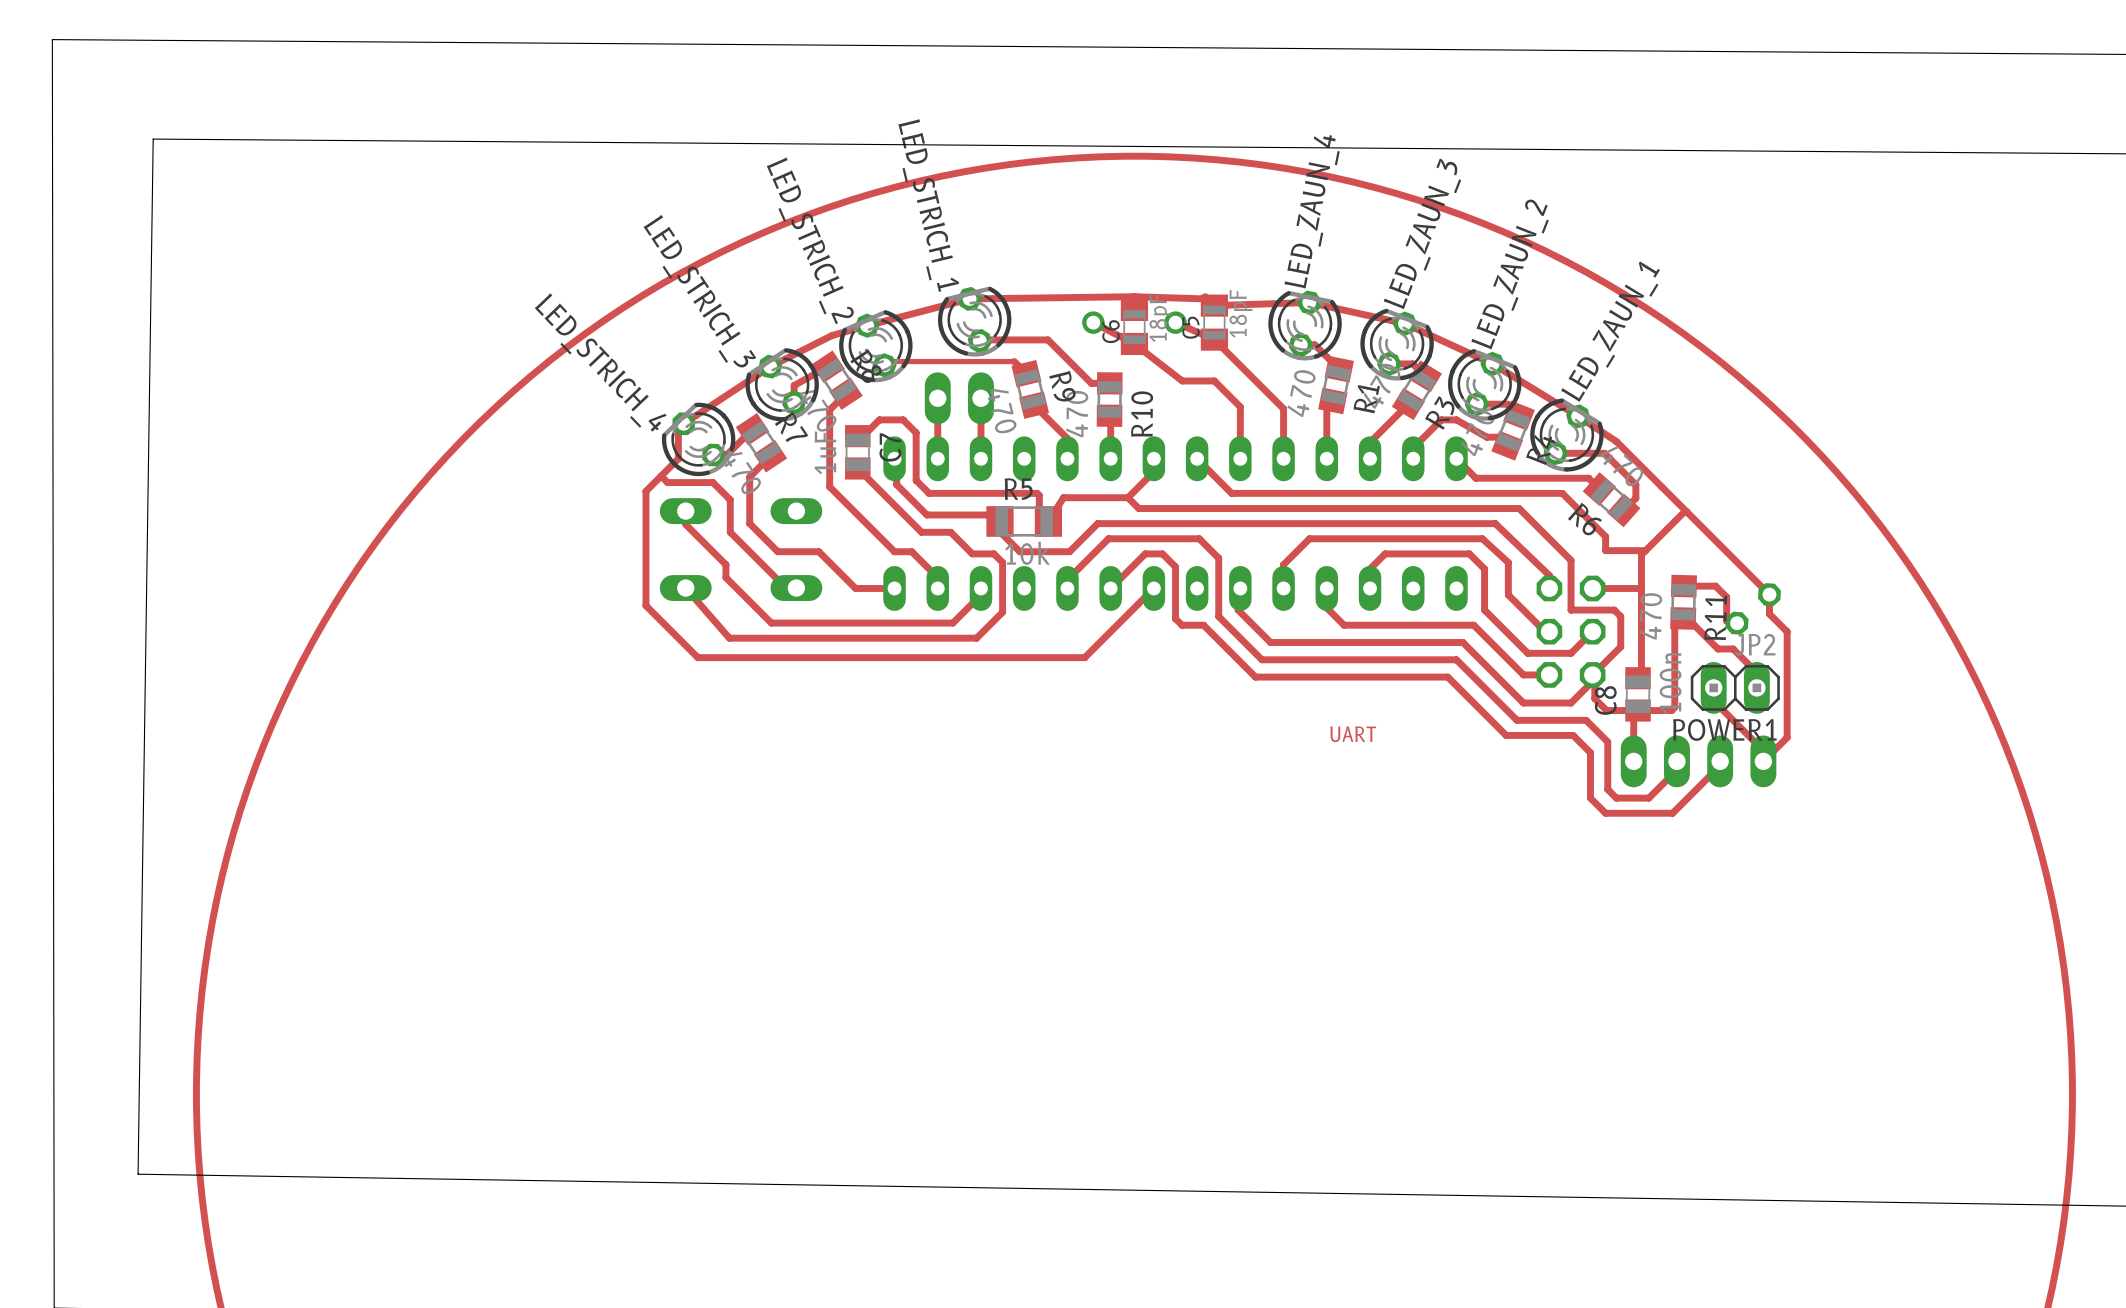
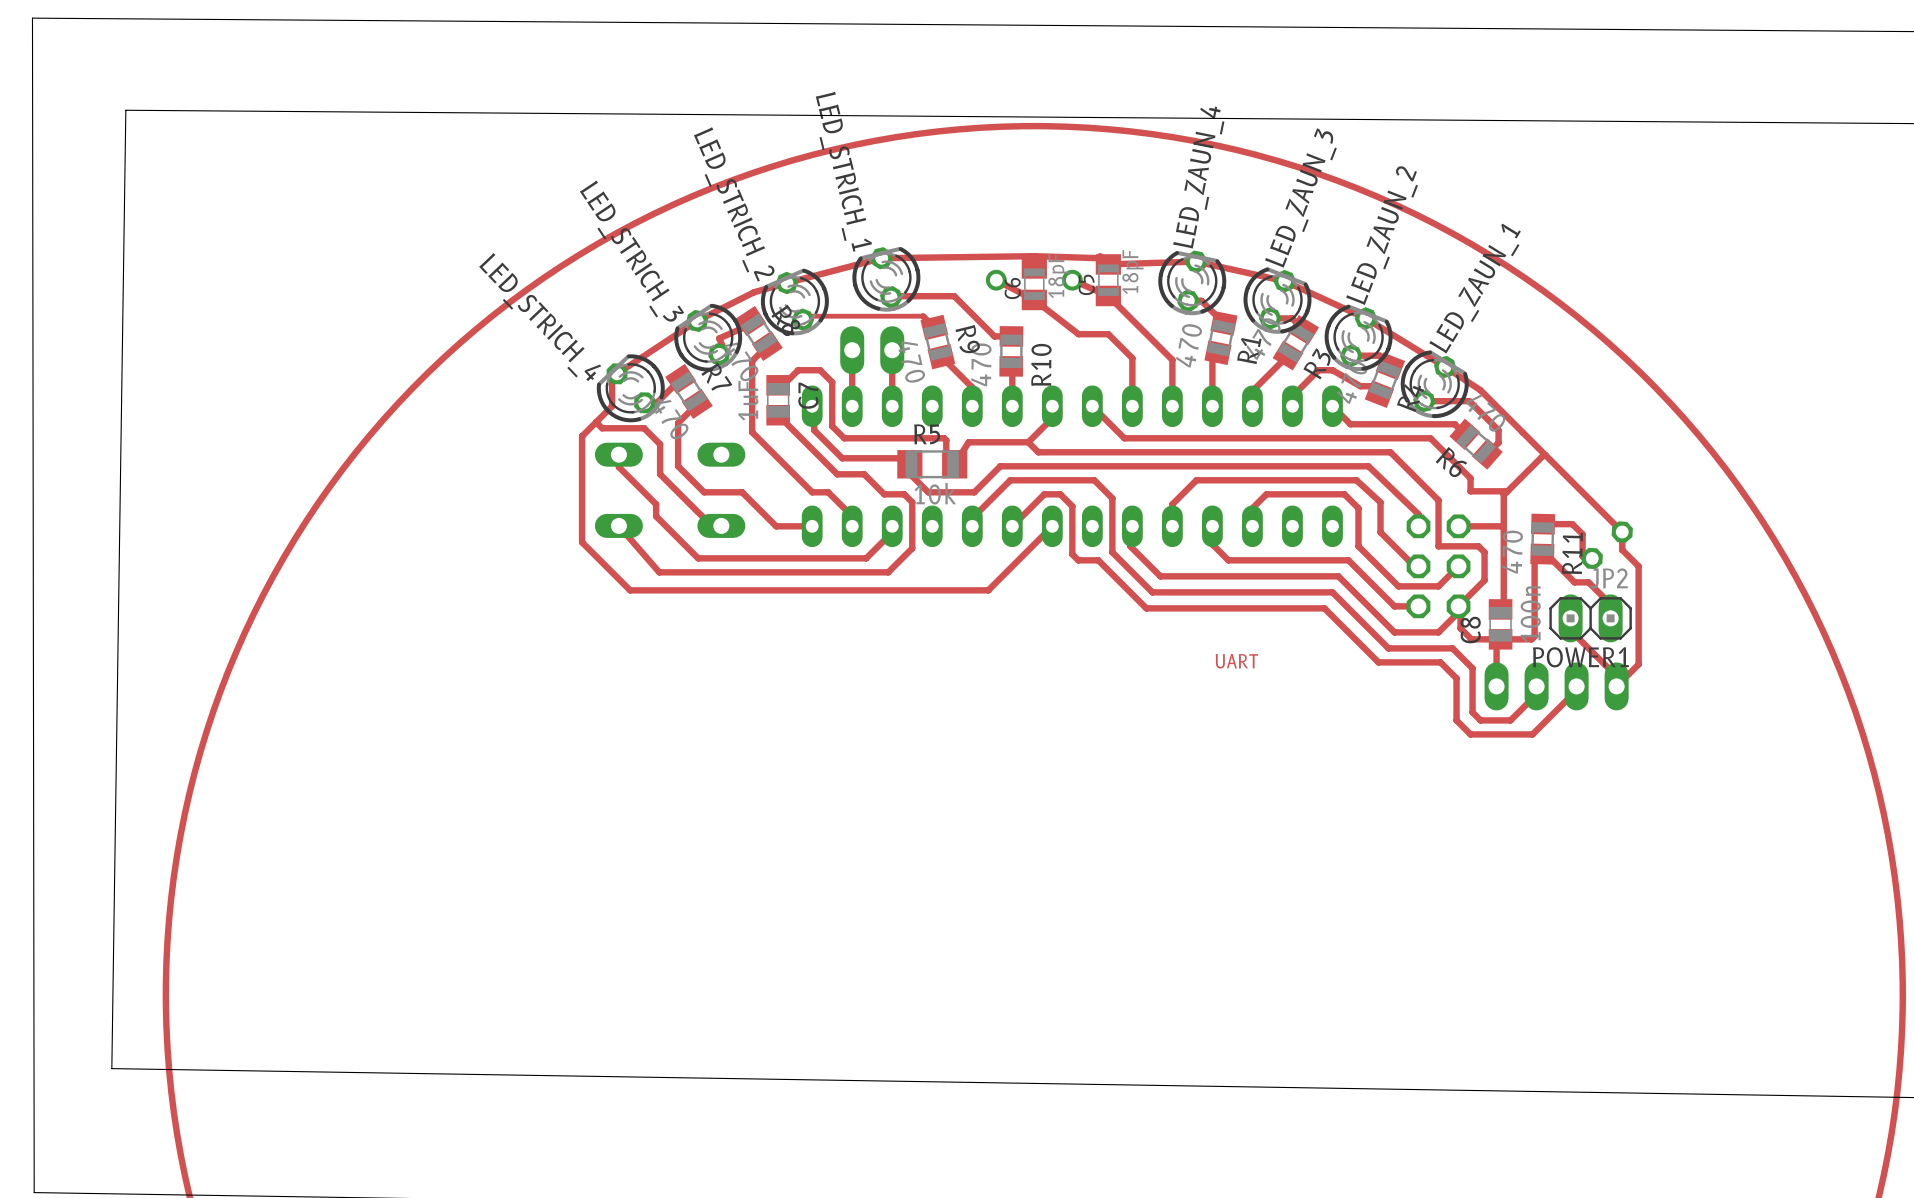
track: (828, 366) (794, 385) (794, 402) -> none
track: none -> (758, 321) (719, 338) (725, 352)

